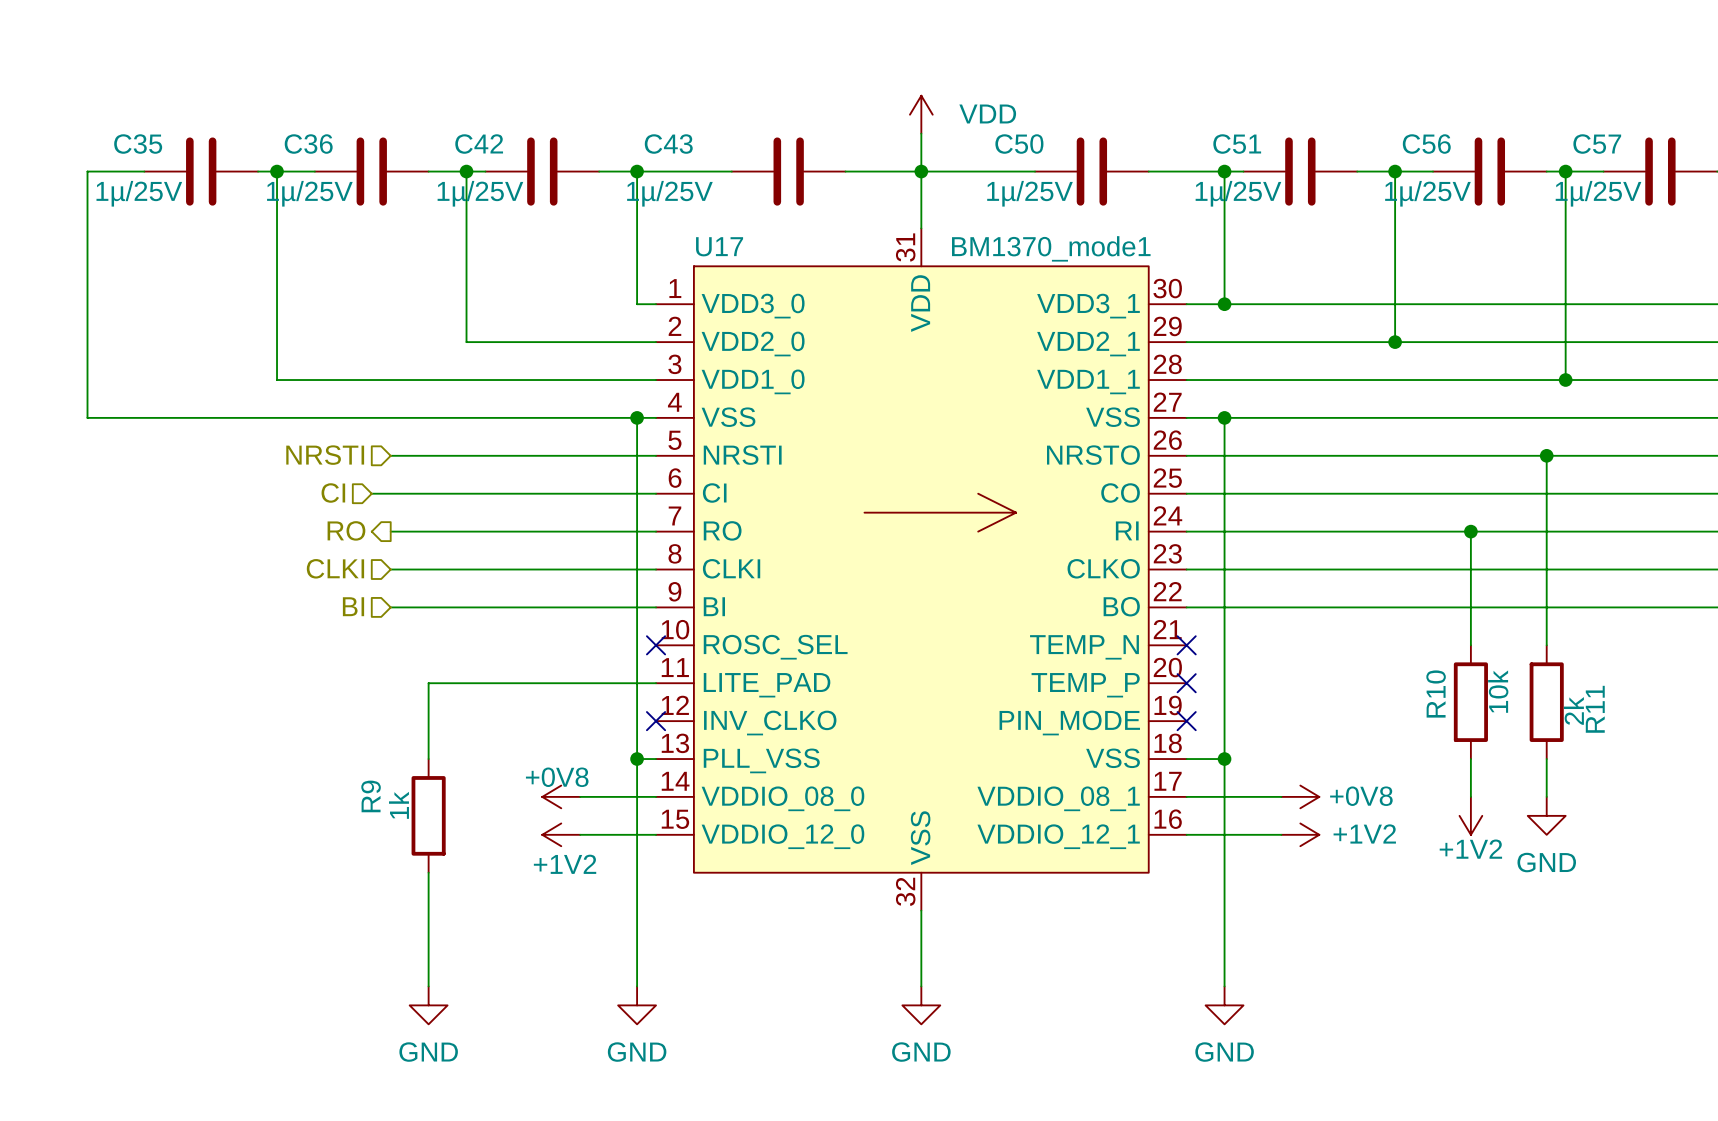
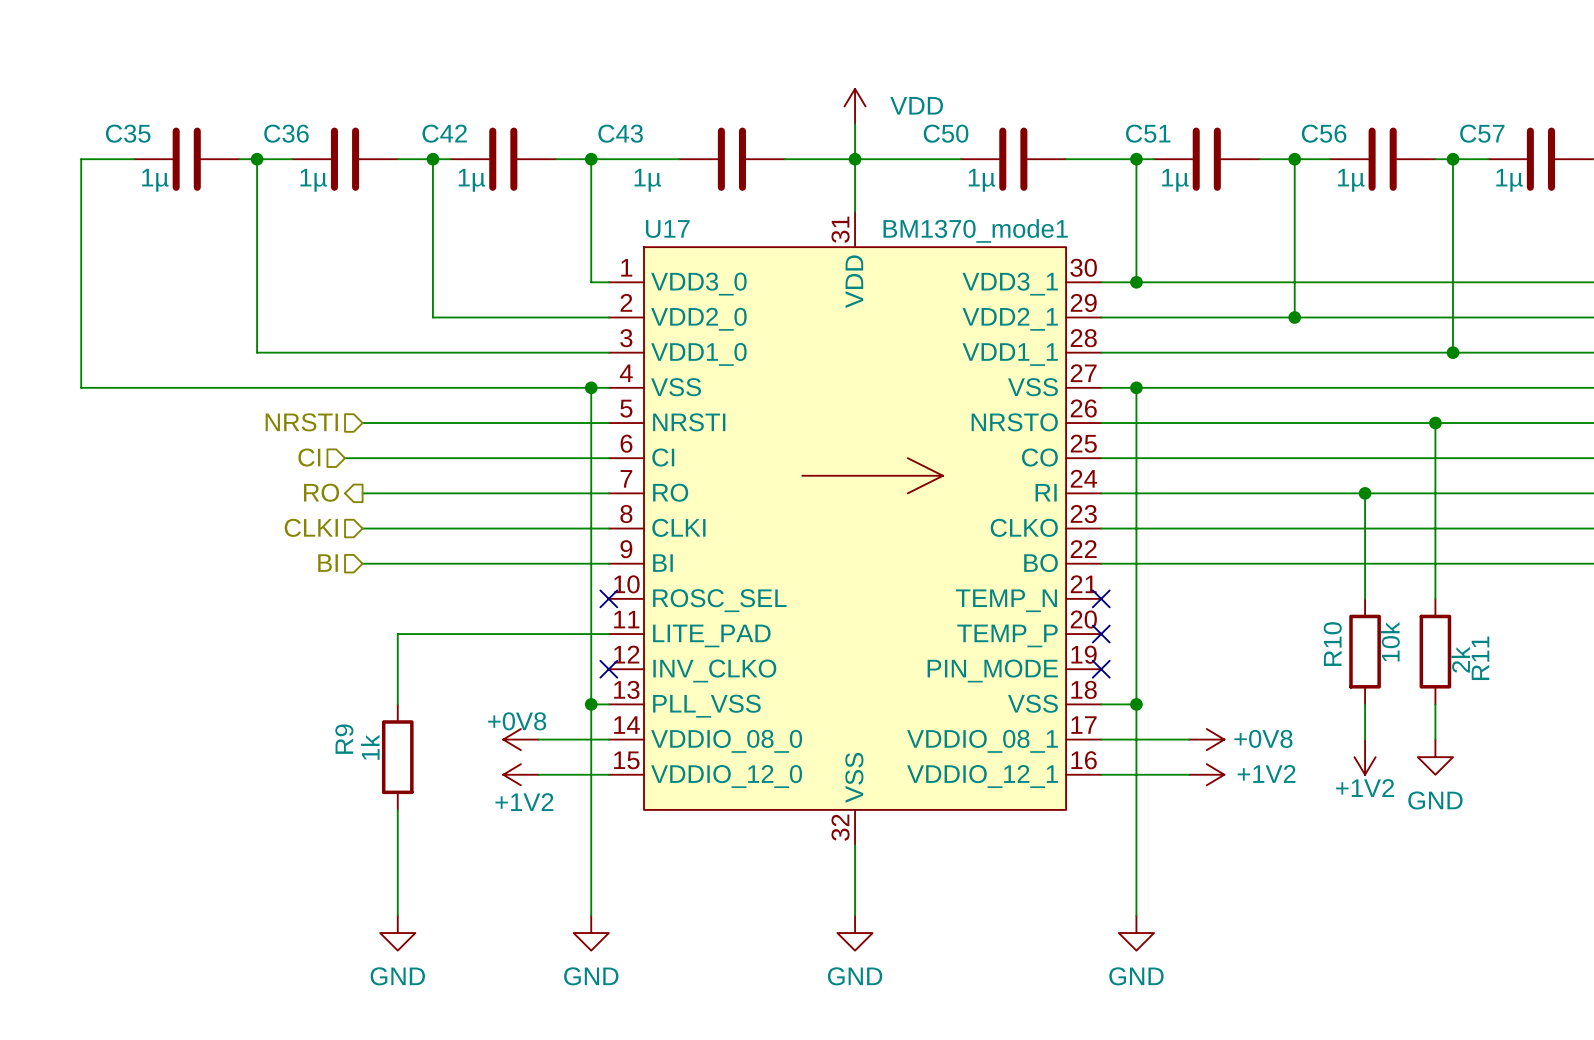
C35 value: 1µ/25V (139, 193) -> 1µ (155, 180)
C36 value: 1µ/25V (309, 193) -> 1µ (313, 180)
C42 value: 1µ/25V (480, 193) -> 1µ (471, 180)
C43 value: 1µ/25V (669, 193) -> 1µ (647, 180)
C50 value: 1µ/25V (1030, 193) -> 1µ (981, 180)
C51 value: 1µ/25V (1238, 193) -> 1µ (1175, 180)
C56 value: 1µ/25V (1427, 193) -> 1µ (1351, 180)
C57 value: 1µ/25V (1598, 193) -> 1µ (1509, 180)

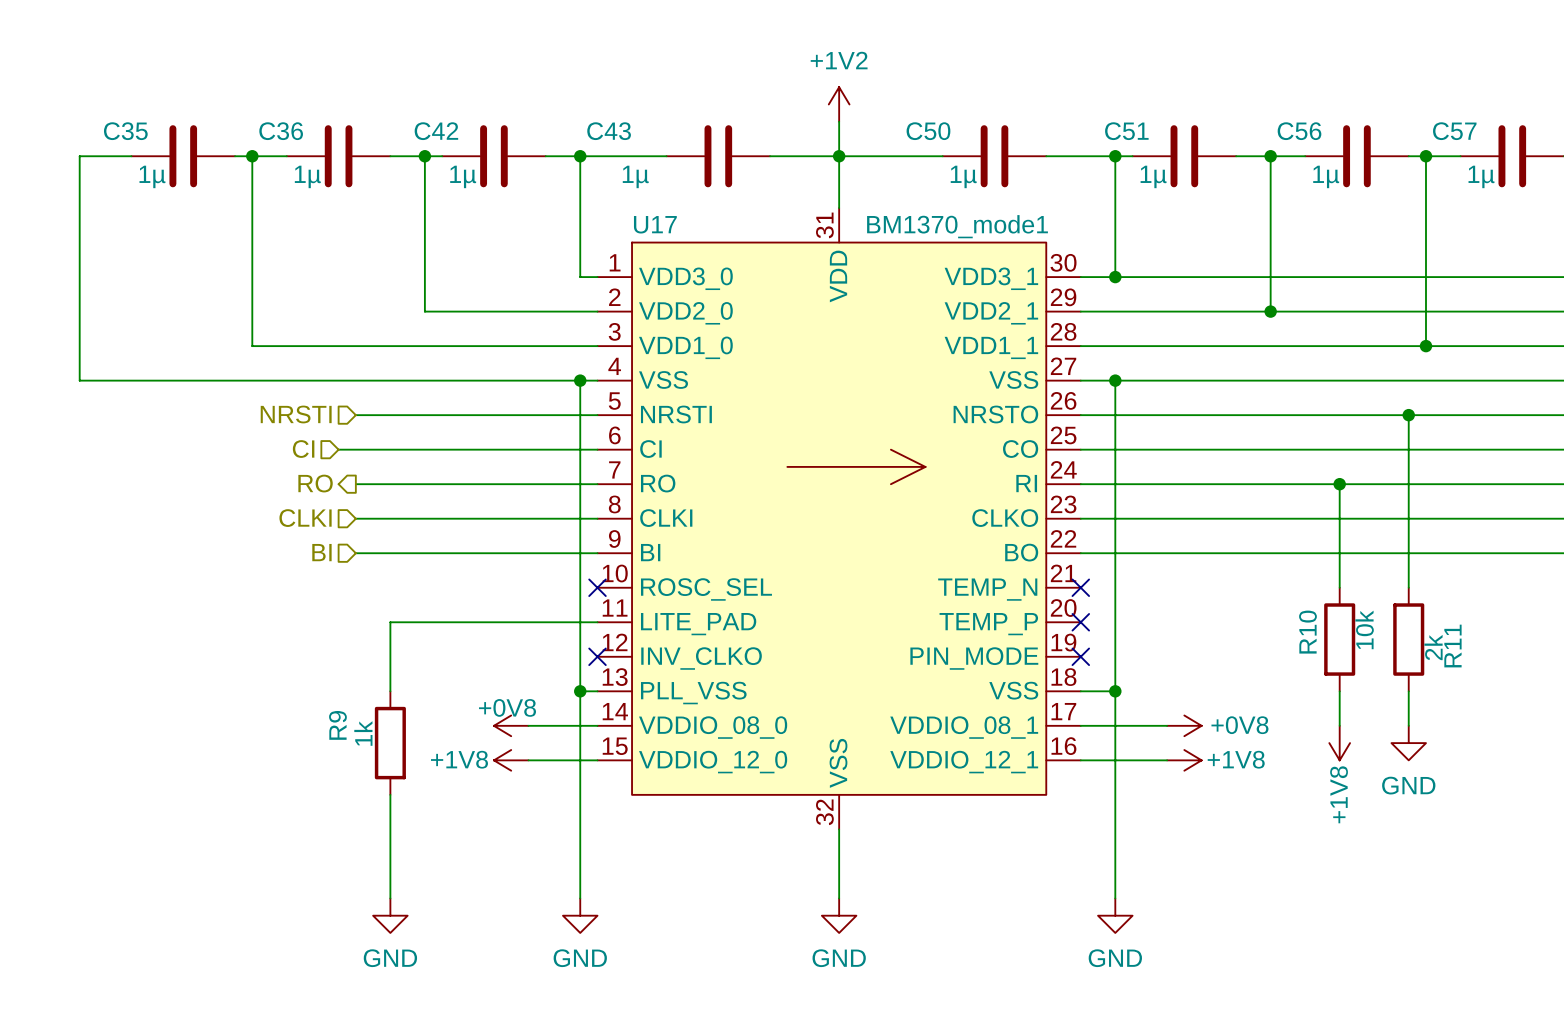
power symbol: VDD (855, 106) -> +1V2 (839, 104)
power symbol: +1V2 (1365, 757) -> +1V8 (1339, 743)
power symbol: +1V2 (520, 774) -> +1V8 (511, 760)
power symbol: +1V2 (1206, 774) -> +1V8 (1184, 760)

